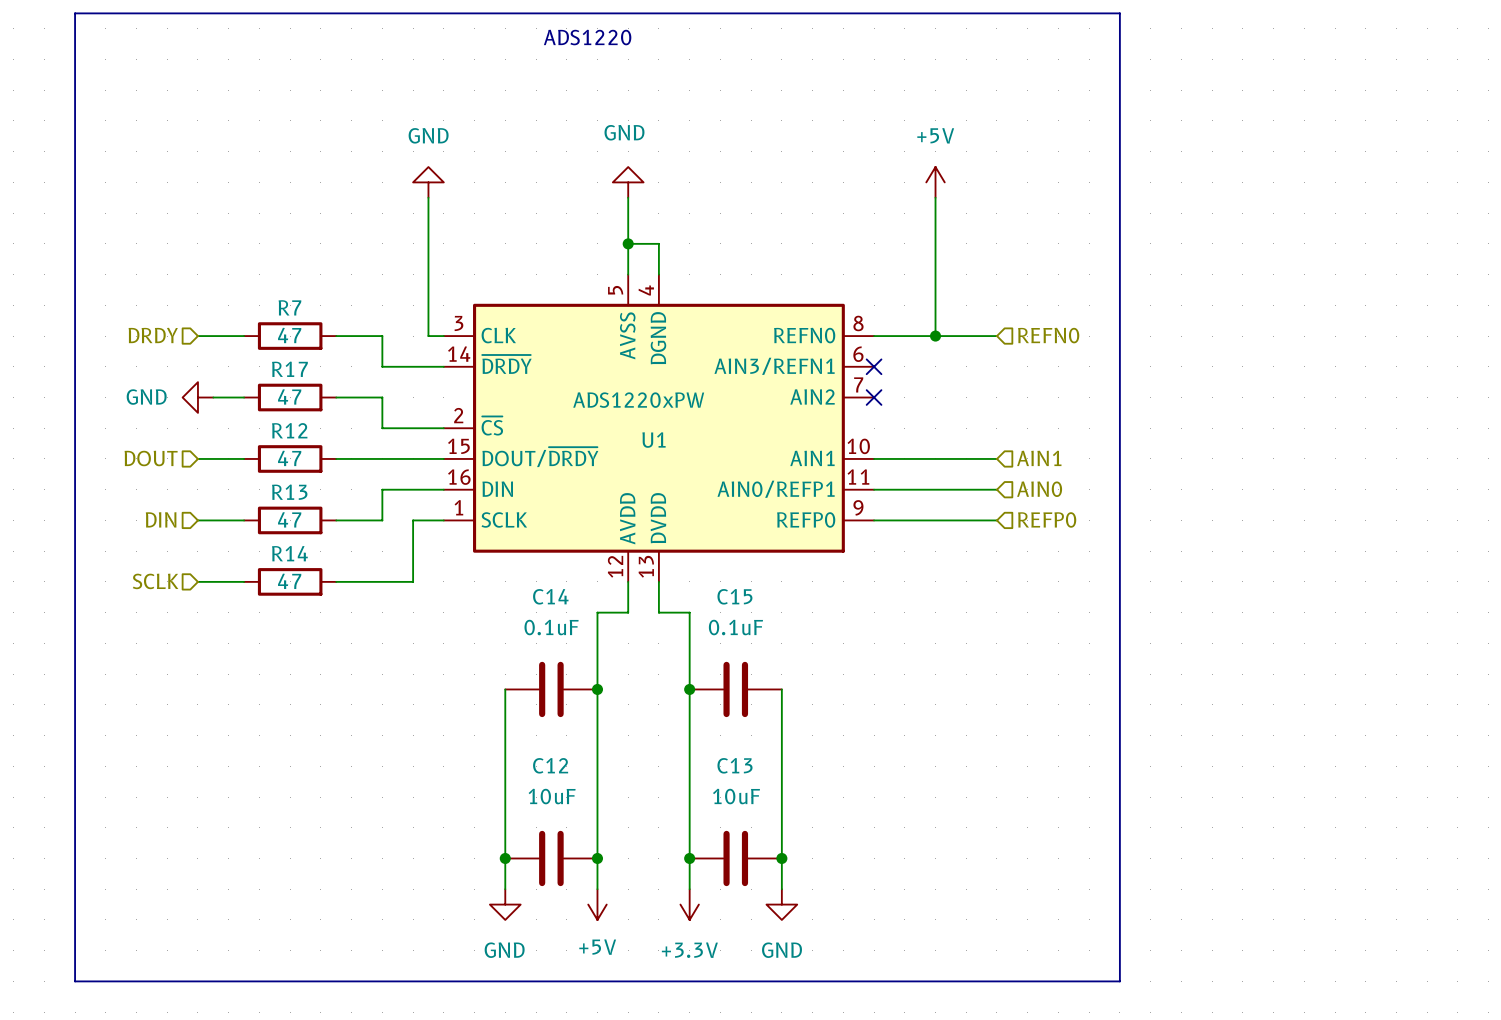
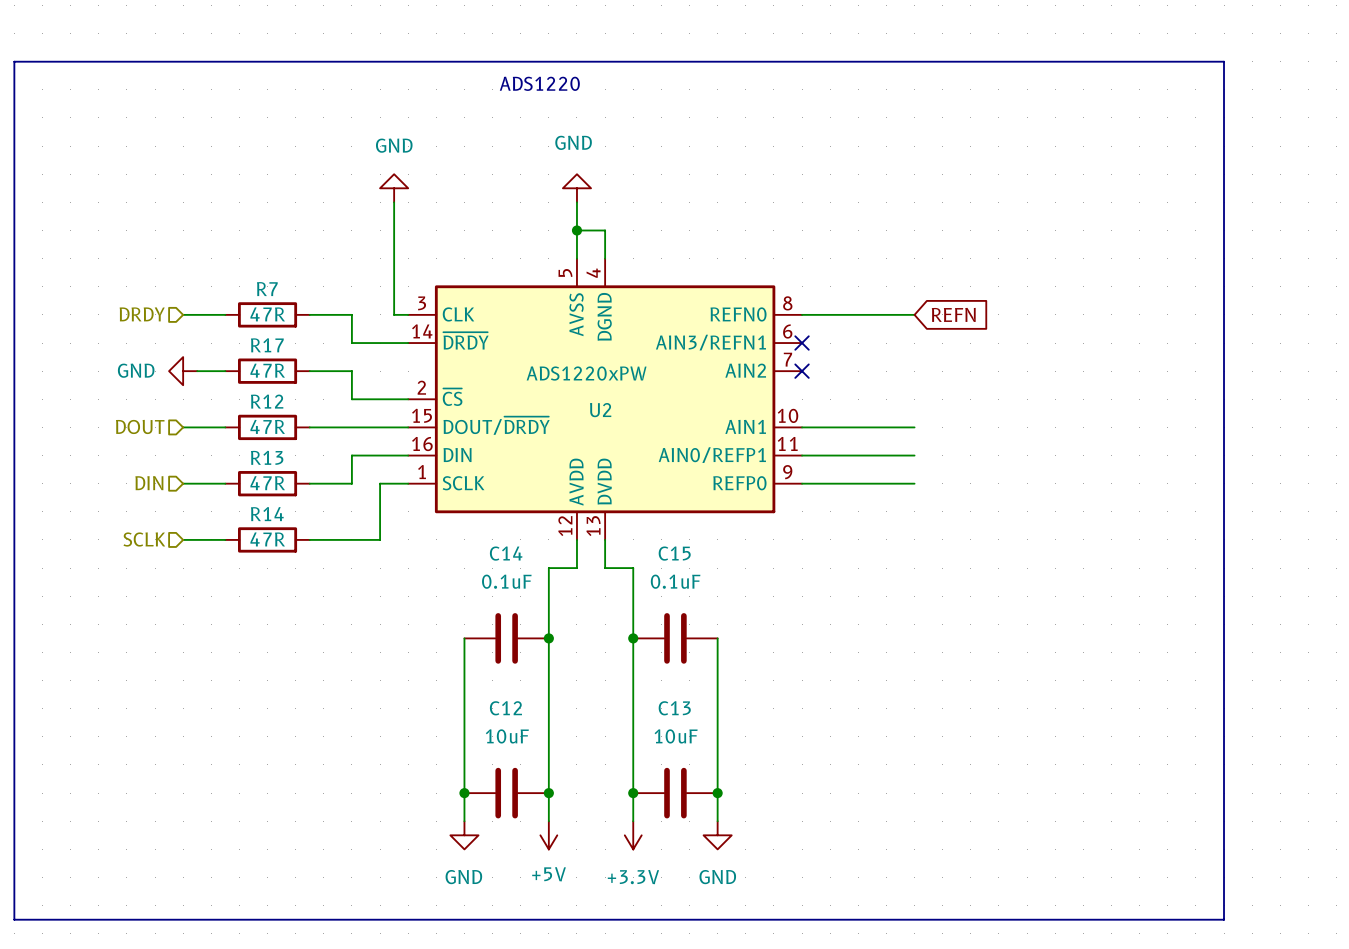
line: (75, 13) (1119, 13) (1119, 981) (75, 981) (75, 13) -> (14, 61) (14, 919) (1224, 919) (1224, 61) (14, 61)
text position: ADS1220 (587, 37) -> ADS1220 (539, 83)
power symbol position: GND (428, 182) -> GND (394, 188)
power symbol position: GND (628, 182) -> GND (576, 188)
power symbol: +5V (935, 182) -> none
wire: (935, 197) (935, 336) -> none
R7 value: 47 (289, 335) -> 47R (267, 314)
hierarchical label: REFN0 (1048, 335) -> none
junction: (935, 336) -> none
global label: none -> REFN (953, 314)
R17 value: 47 (289, 396) -> 47R (267, 370)
U1 name: U1 (654, 440) -> U2 (600, 410)
R12 value: 47 (289, 458) -> 47R (267, 426)
hierarchical label: AIN1 (1039, 458) -> none
hierarchical label: AIN0 (1039, 489) -> none
R13 value: 47 (289, 519) -> 47R (267, 483)
hierarchical label: REFP0 (1047, 519) -> none
R14 value: 47 (289, 581) -> 47R (267, 539)

